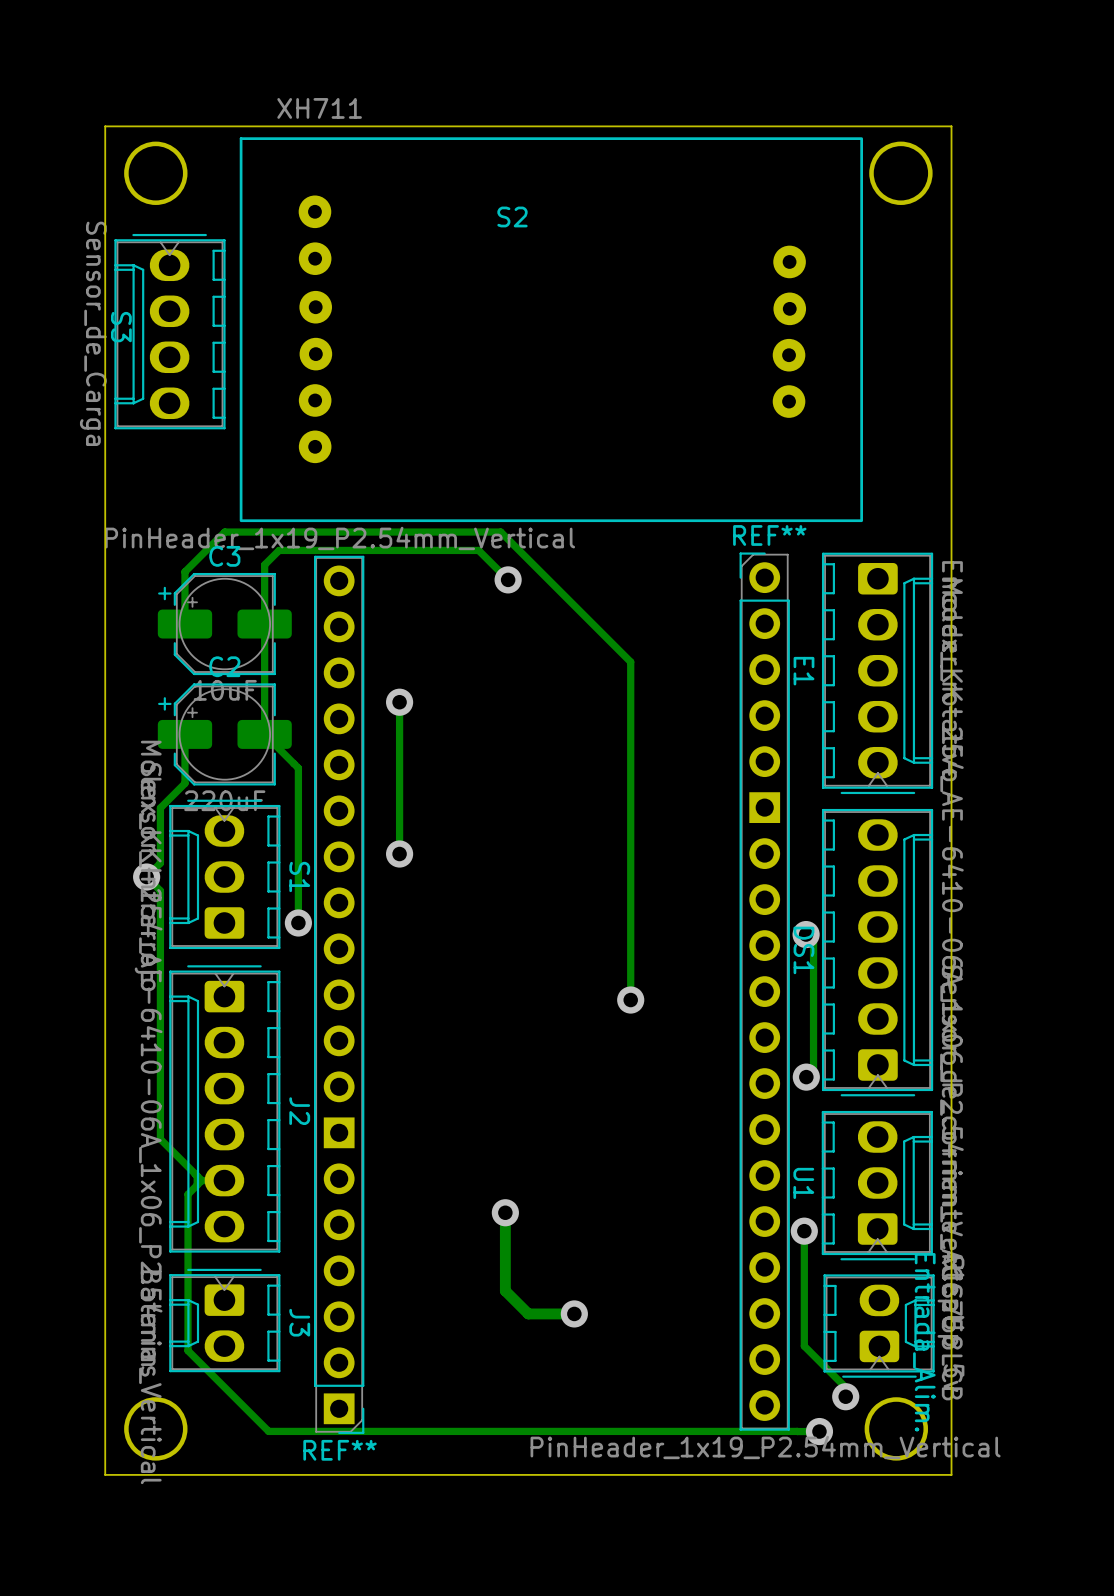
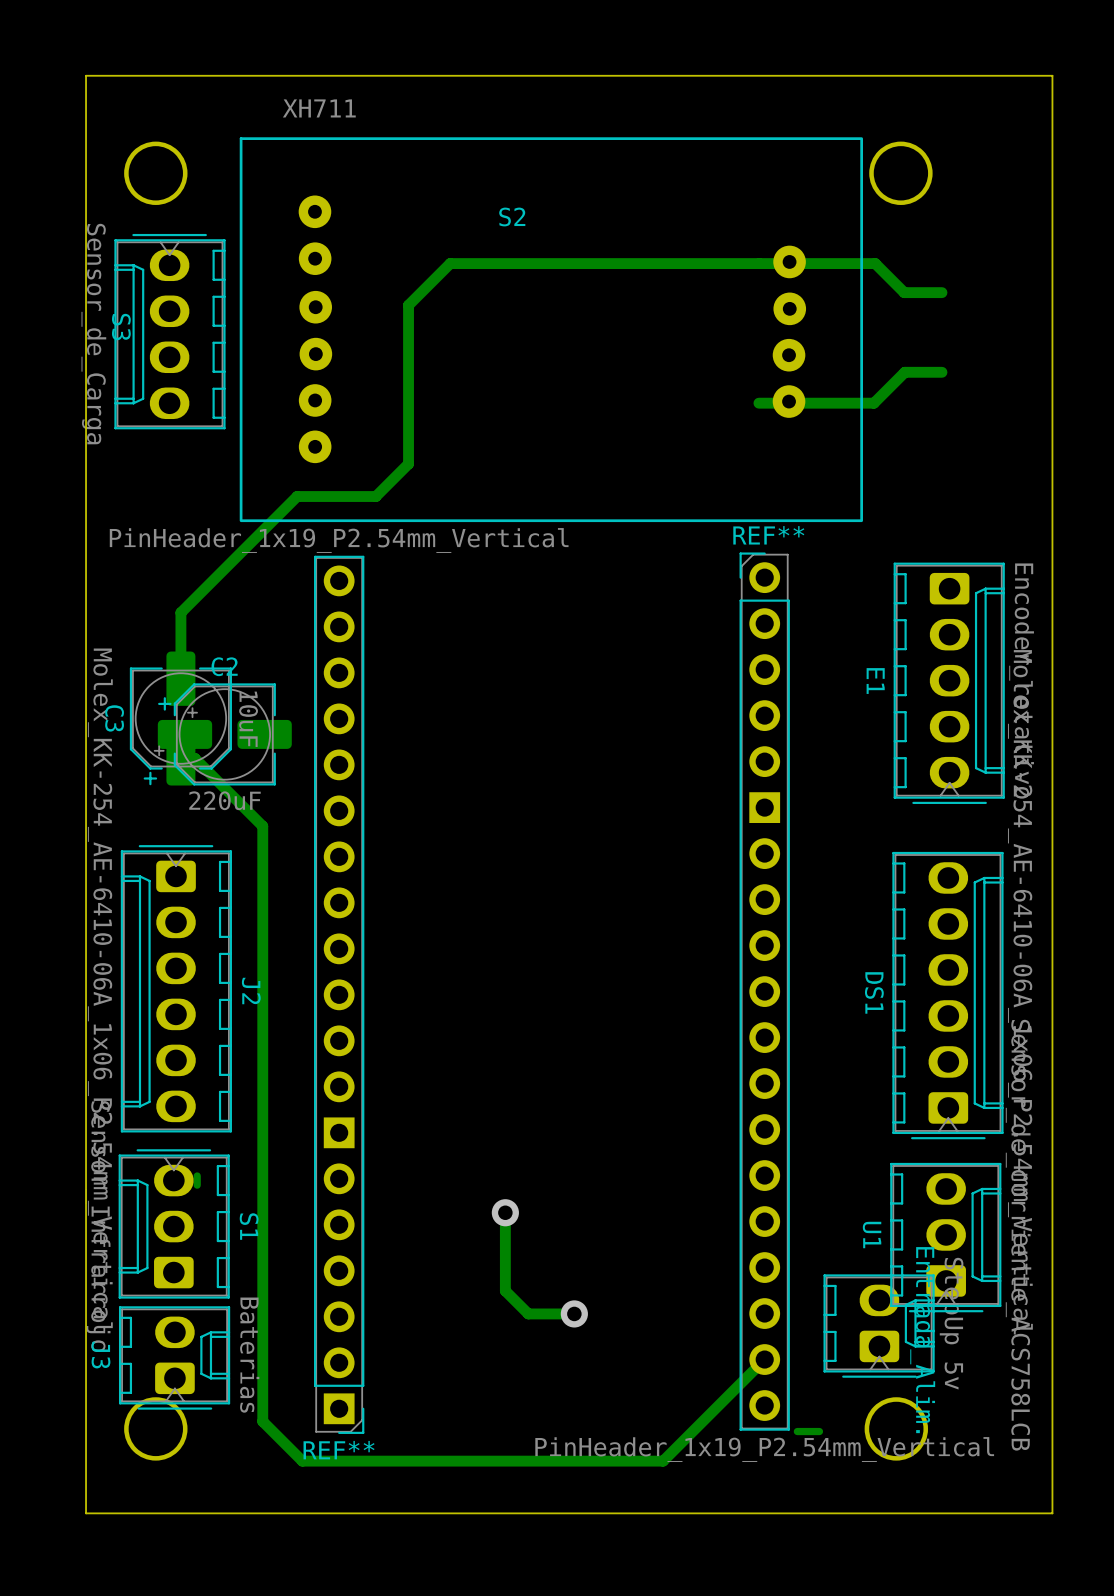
board edge: (951, 126) (951, 1474) (105, 1474) (105, 126) (951, 126) -> (1052, 75) (1052, 1513) (86, 1513) (86, 75) (1052, 75)
track: none -> (941, 292) (904, 292) (875, 263) (450, 263) (408, 305) (408, 463) (375, 496) (297, 496) (180, 612) (180, 678)
track: none -> (941, 372) (904, 372) (873, 403) (758, 403)
track: (508, 579) (478, 550) (279, 550) (264, 564) (264, 734) (298, 768) (298, 922) -> none
via: (508, 579) -> none
track: (184, 624) (184, 571) (224, 532) (500, 532) (630, 661) (630, 1000) -> none
C3 rotation: 0° (224, 624) -> 90° counterclockwise (180, 718)
C3 position: (224, 624) -> (180, 718)
E1 position: (877, 673) -> (949, 683)
track: (399, 702) (399, 854) -> none
via: (399, 702) -> none
track: (184, 734) (184, 783) (160, 808) (160, 863) (146, 877) (160, 890) (160, 1139) (201, 1180) -> none
track: none -> (180, 758) (194, 758) (262, 826) (262, 1421) (302, 1461) (663, 1461) (764, 1359)
via: (399, 854) -> none
S1 position: (224, 874) -> (174, 1223)
via: (146, 877) -> none
via: (298, 922) -> none
track: (806, 934) (813, 941) (813, 1069) (806, 1077) -> none
via: (806, 934) -> none
DS1 position: (877, 952) -> (947, 995)
via: (630, 1000) -> none
via: (806, 1077) -> none
J2 position: (224, 1108) -> (176, 988)
track: (201, 1180) (188, 1194) (188, 1350) (268, 1431) (797, 1431) -> none
U1 position: (877, 1185) -> (945, 1237)
track: (804, 1231) (804, 1346) (845, 1387) (845, 1396) -> none
via: (804, 1231) -> none
J3 rotation: 0° (224, 1320) -> 180° (174, 1357)
via: (845, 1396) -> none
via: (819, 1431) -> none

